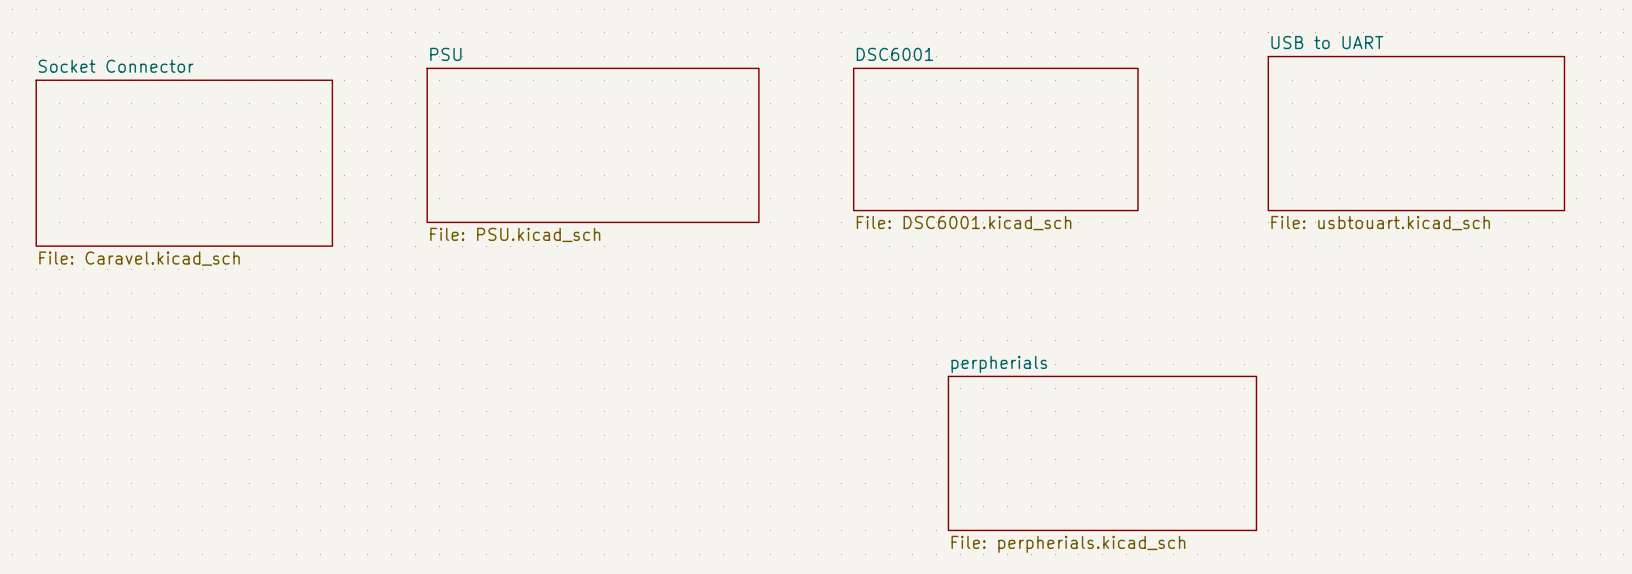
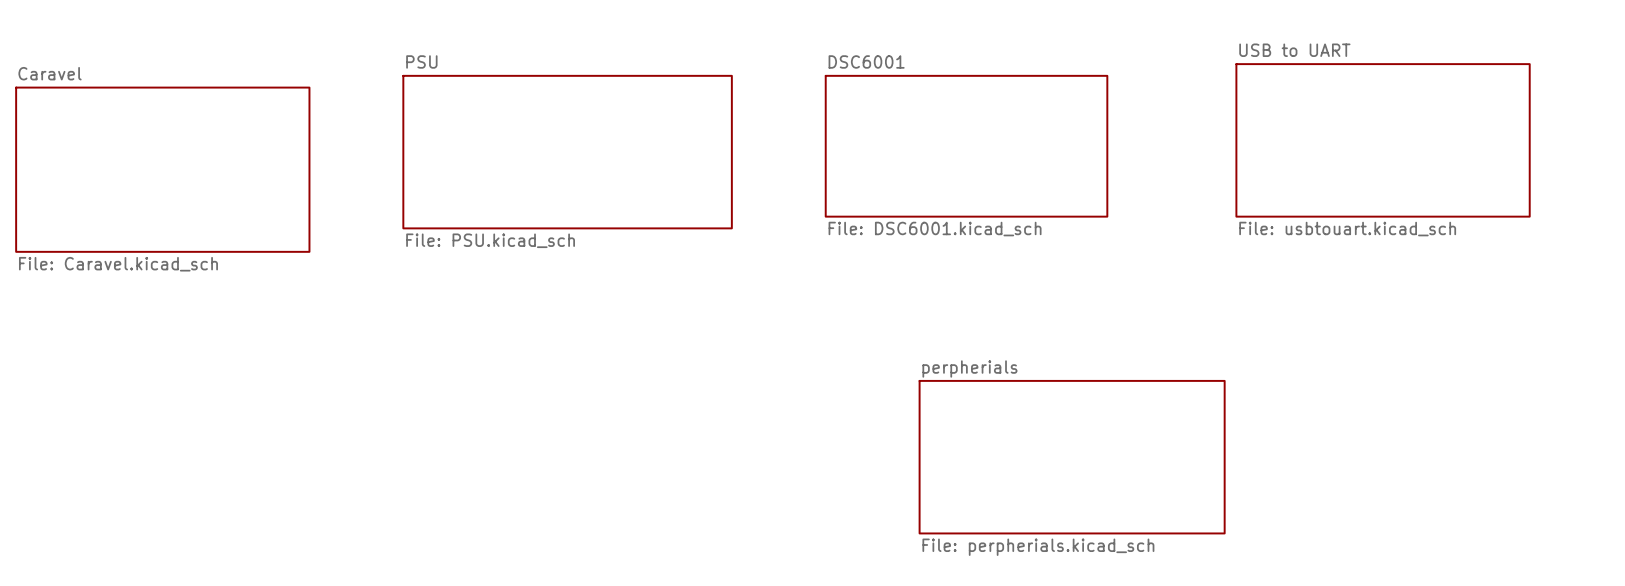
sheet Socket Connector name: Socket Connector (116, 66) -> Caravel (50, 73)

